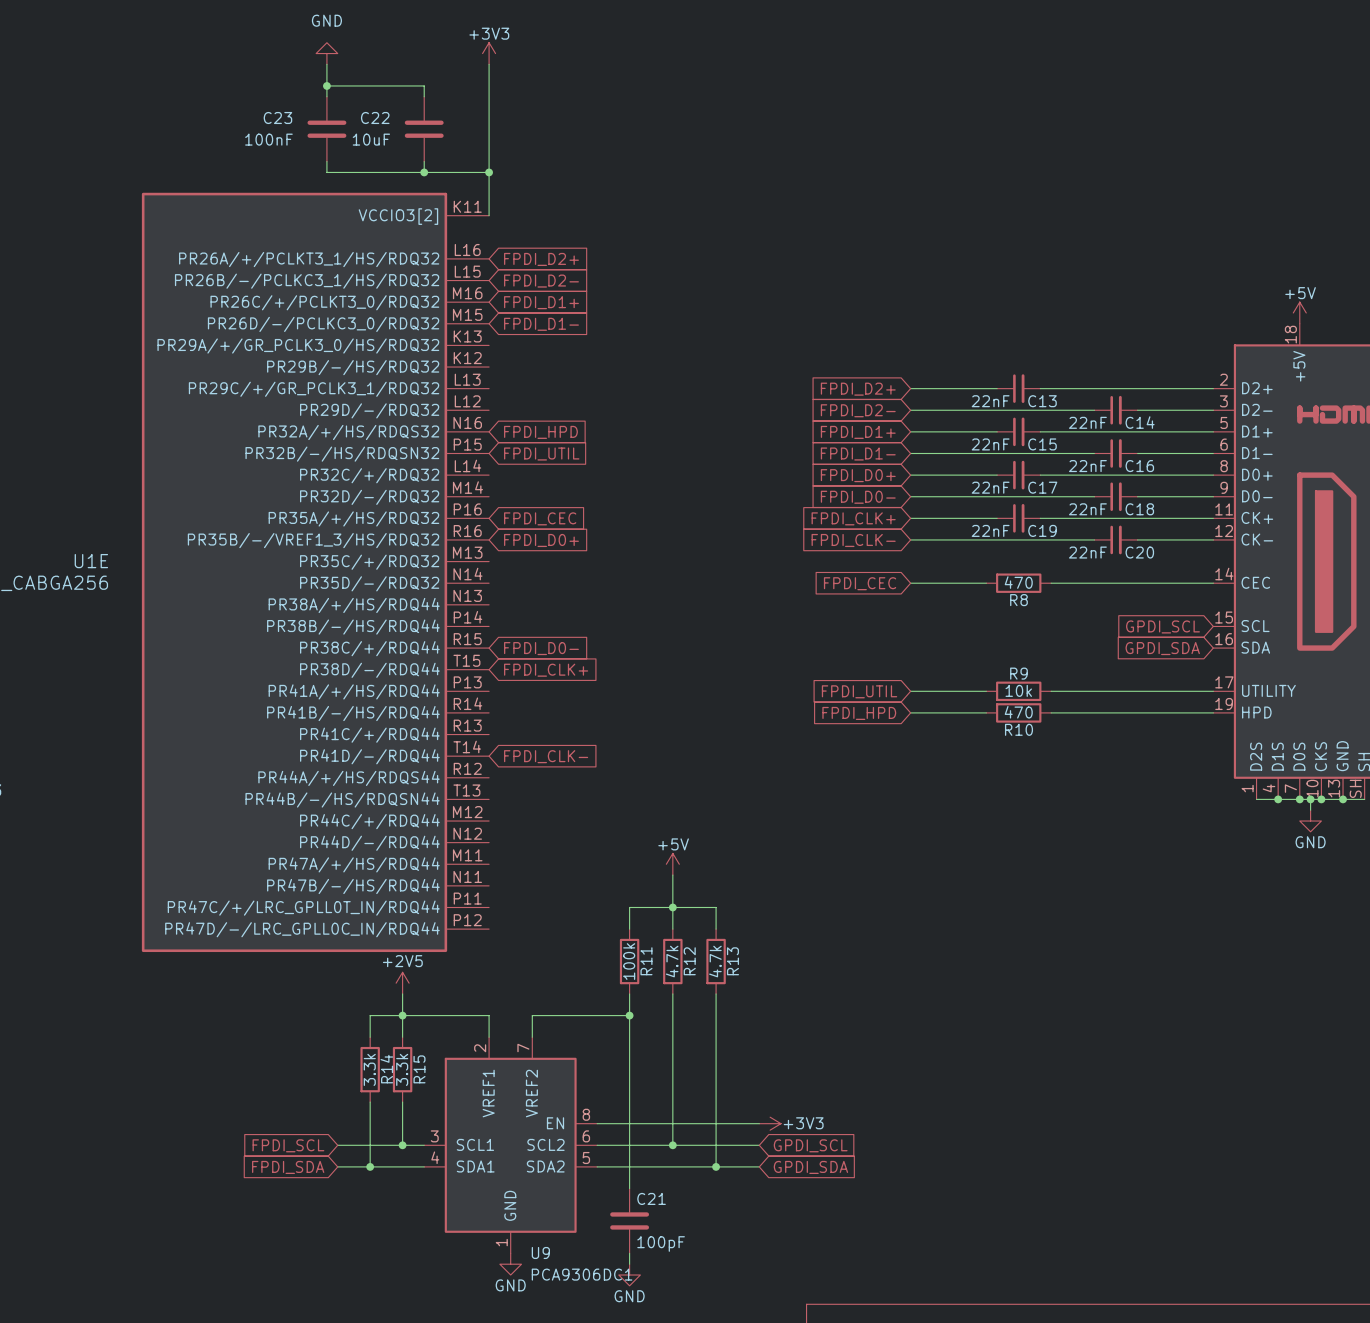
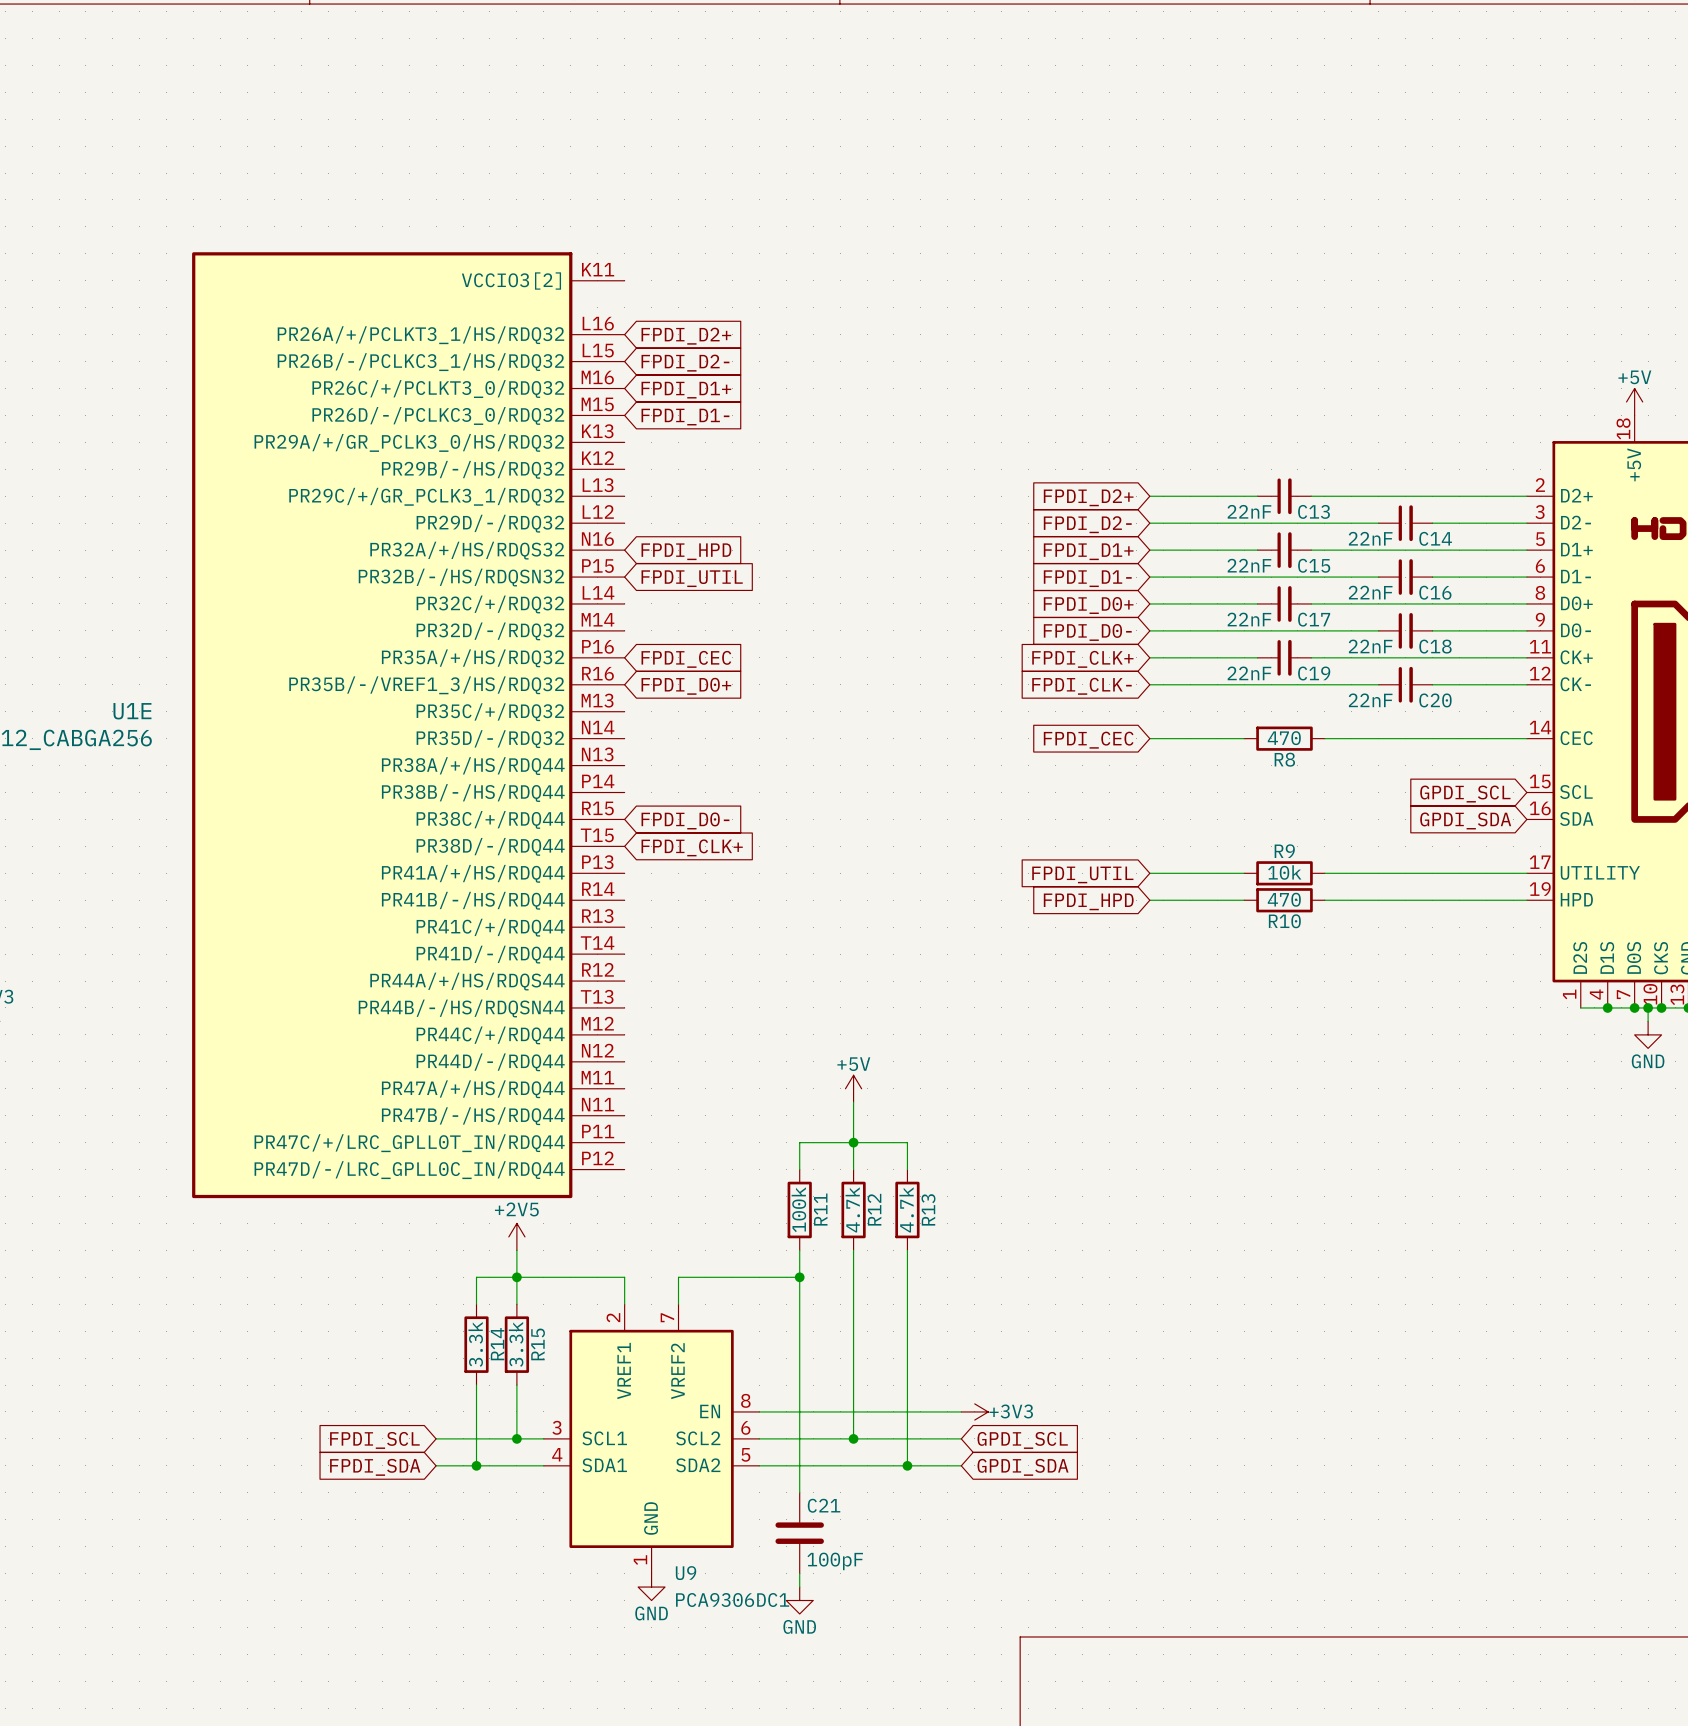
power symbol: GND (326, 53) -> none
power symbol: +3V3 (489, 53) -> none
wire: (326, 64) (326, 96) -> none
wire: (489, 64) (489, 215) -> none
wire: (326, 85) (424, 85) (424, 96) -> none
junction: (326, 85) -> none
C23: 100nF (326, 129) -> none
C22: 10uF (424, 129) -> none
wire: (326, 161) (326, 172) (489, 172) -> none
wire: (424, 161) (424, 172) -> none
junction: (424, 172) -> none
junction: (489, 172) -> none
global label: FPDI_CLK- (546, 756) -> none

